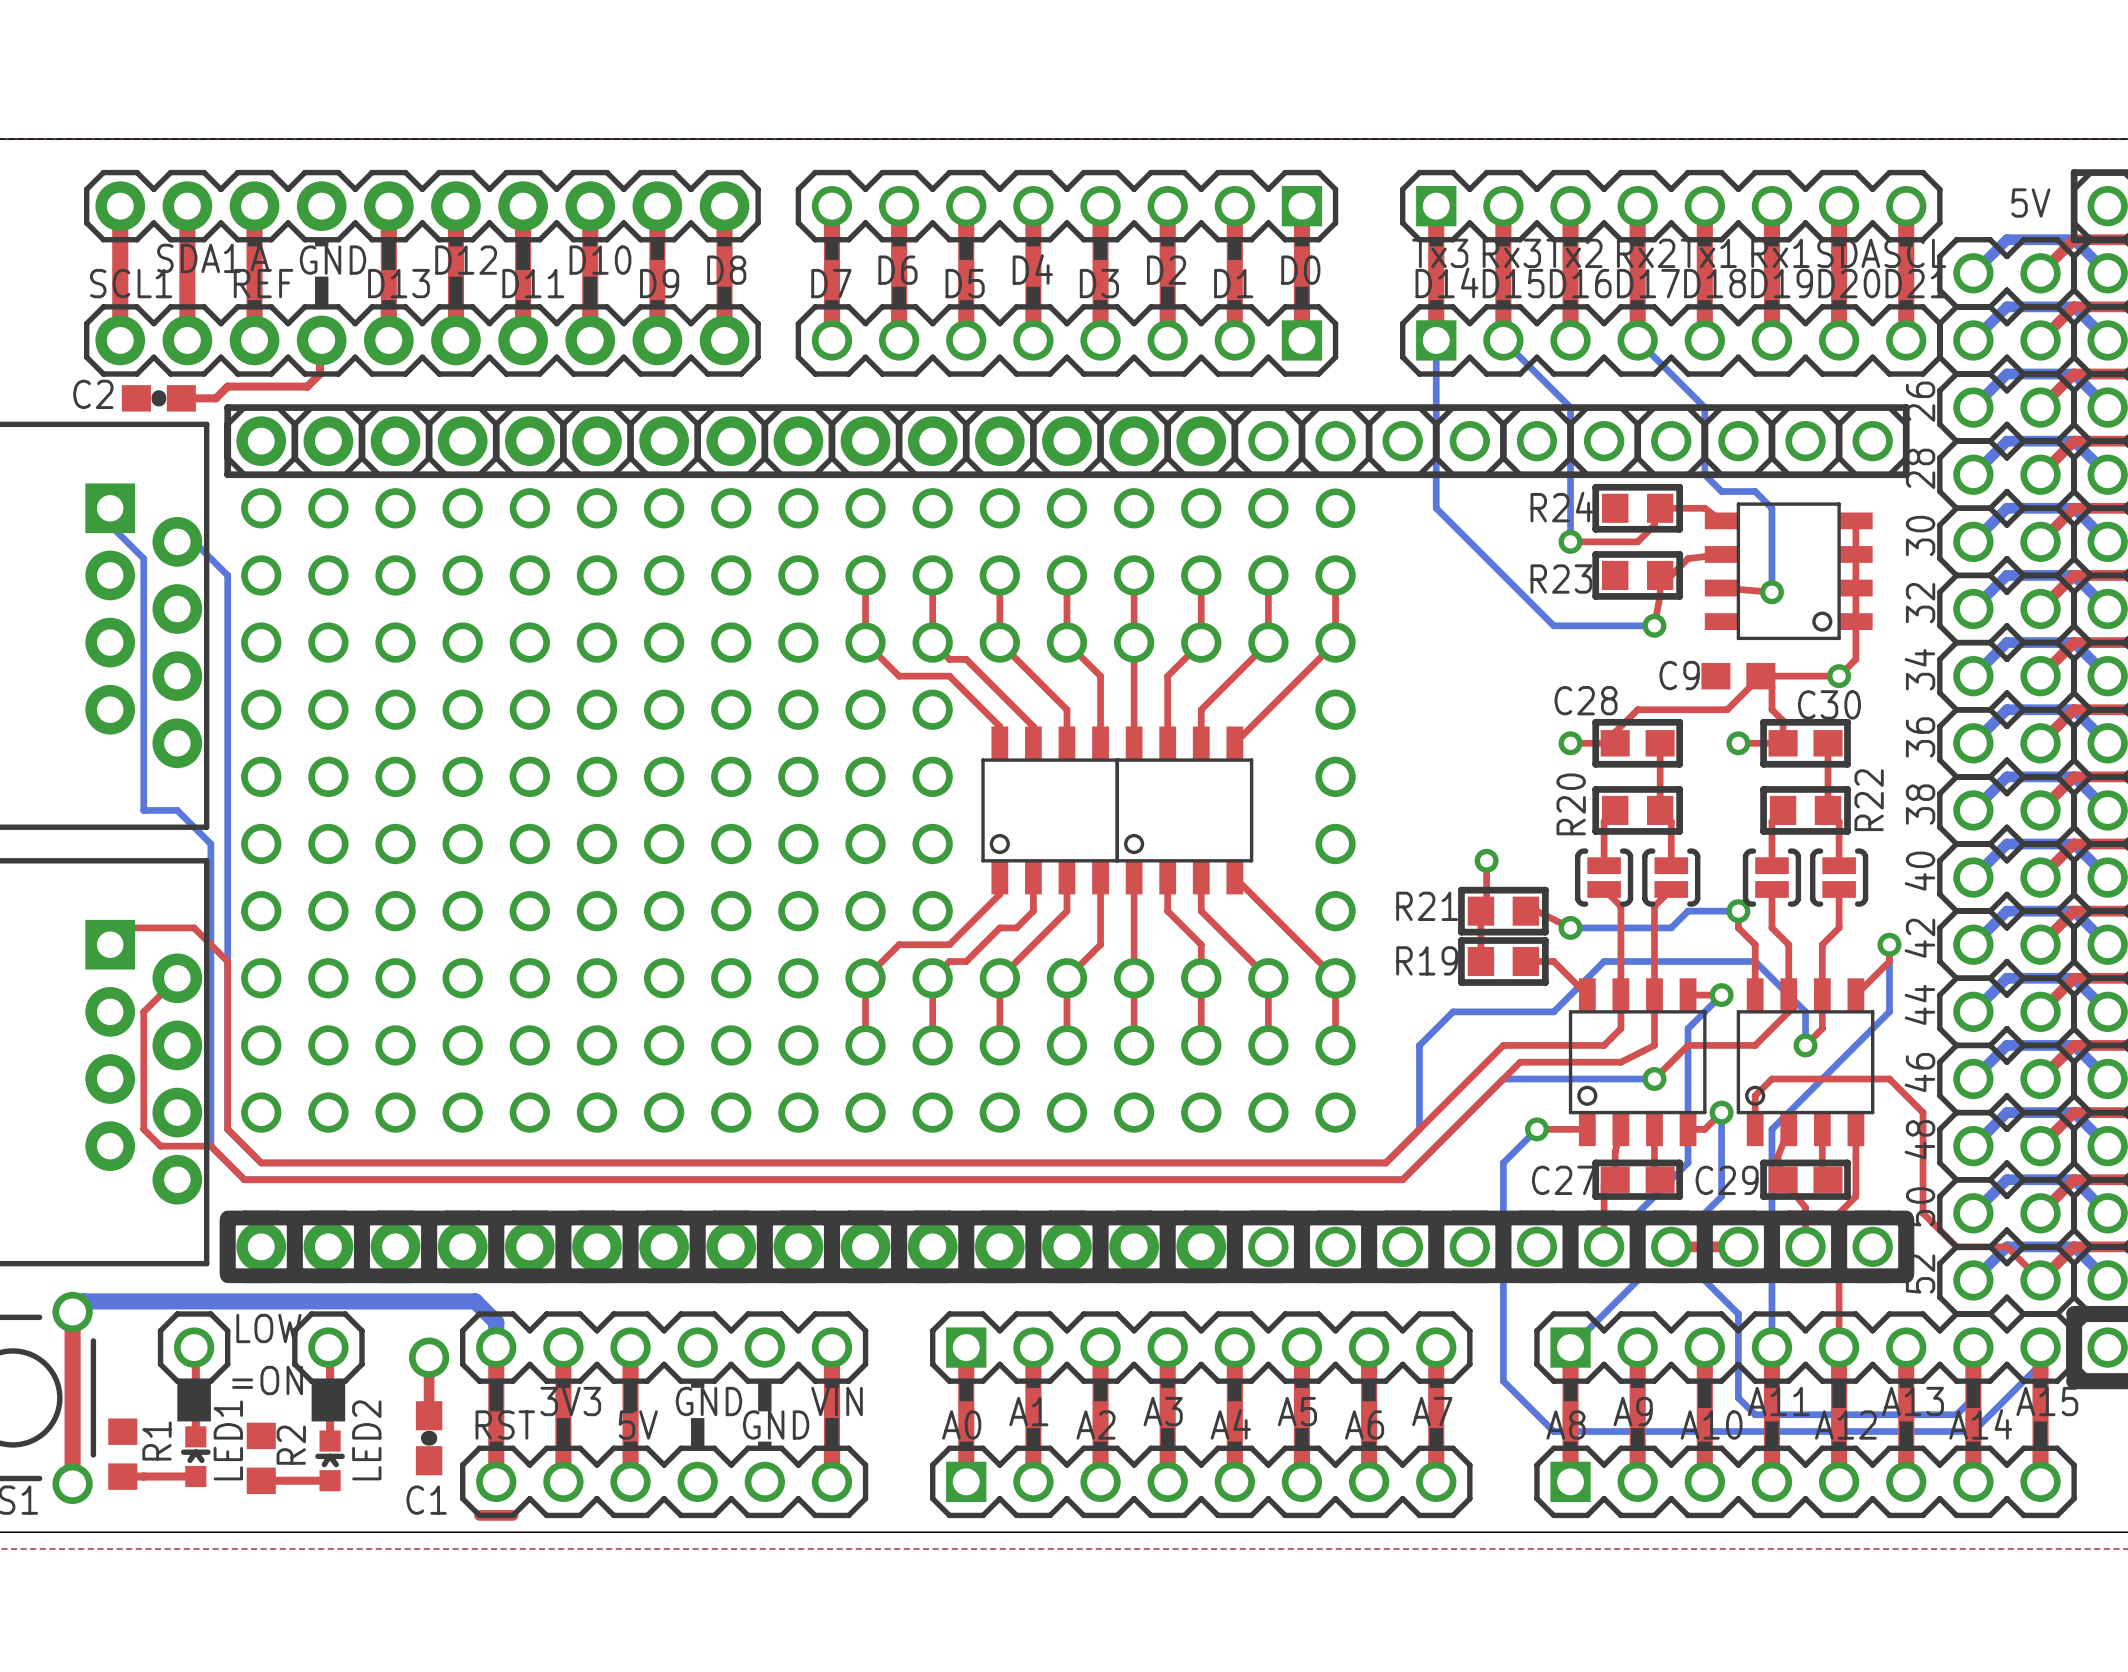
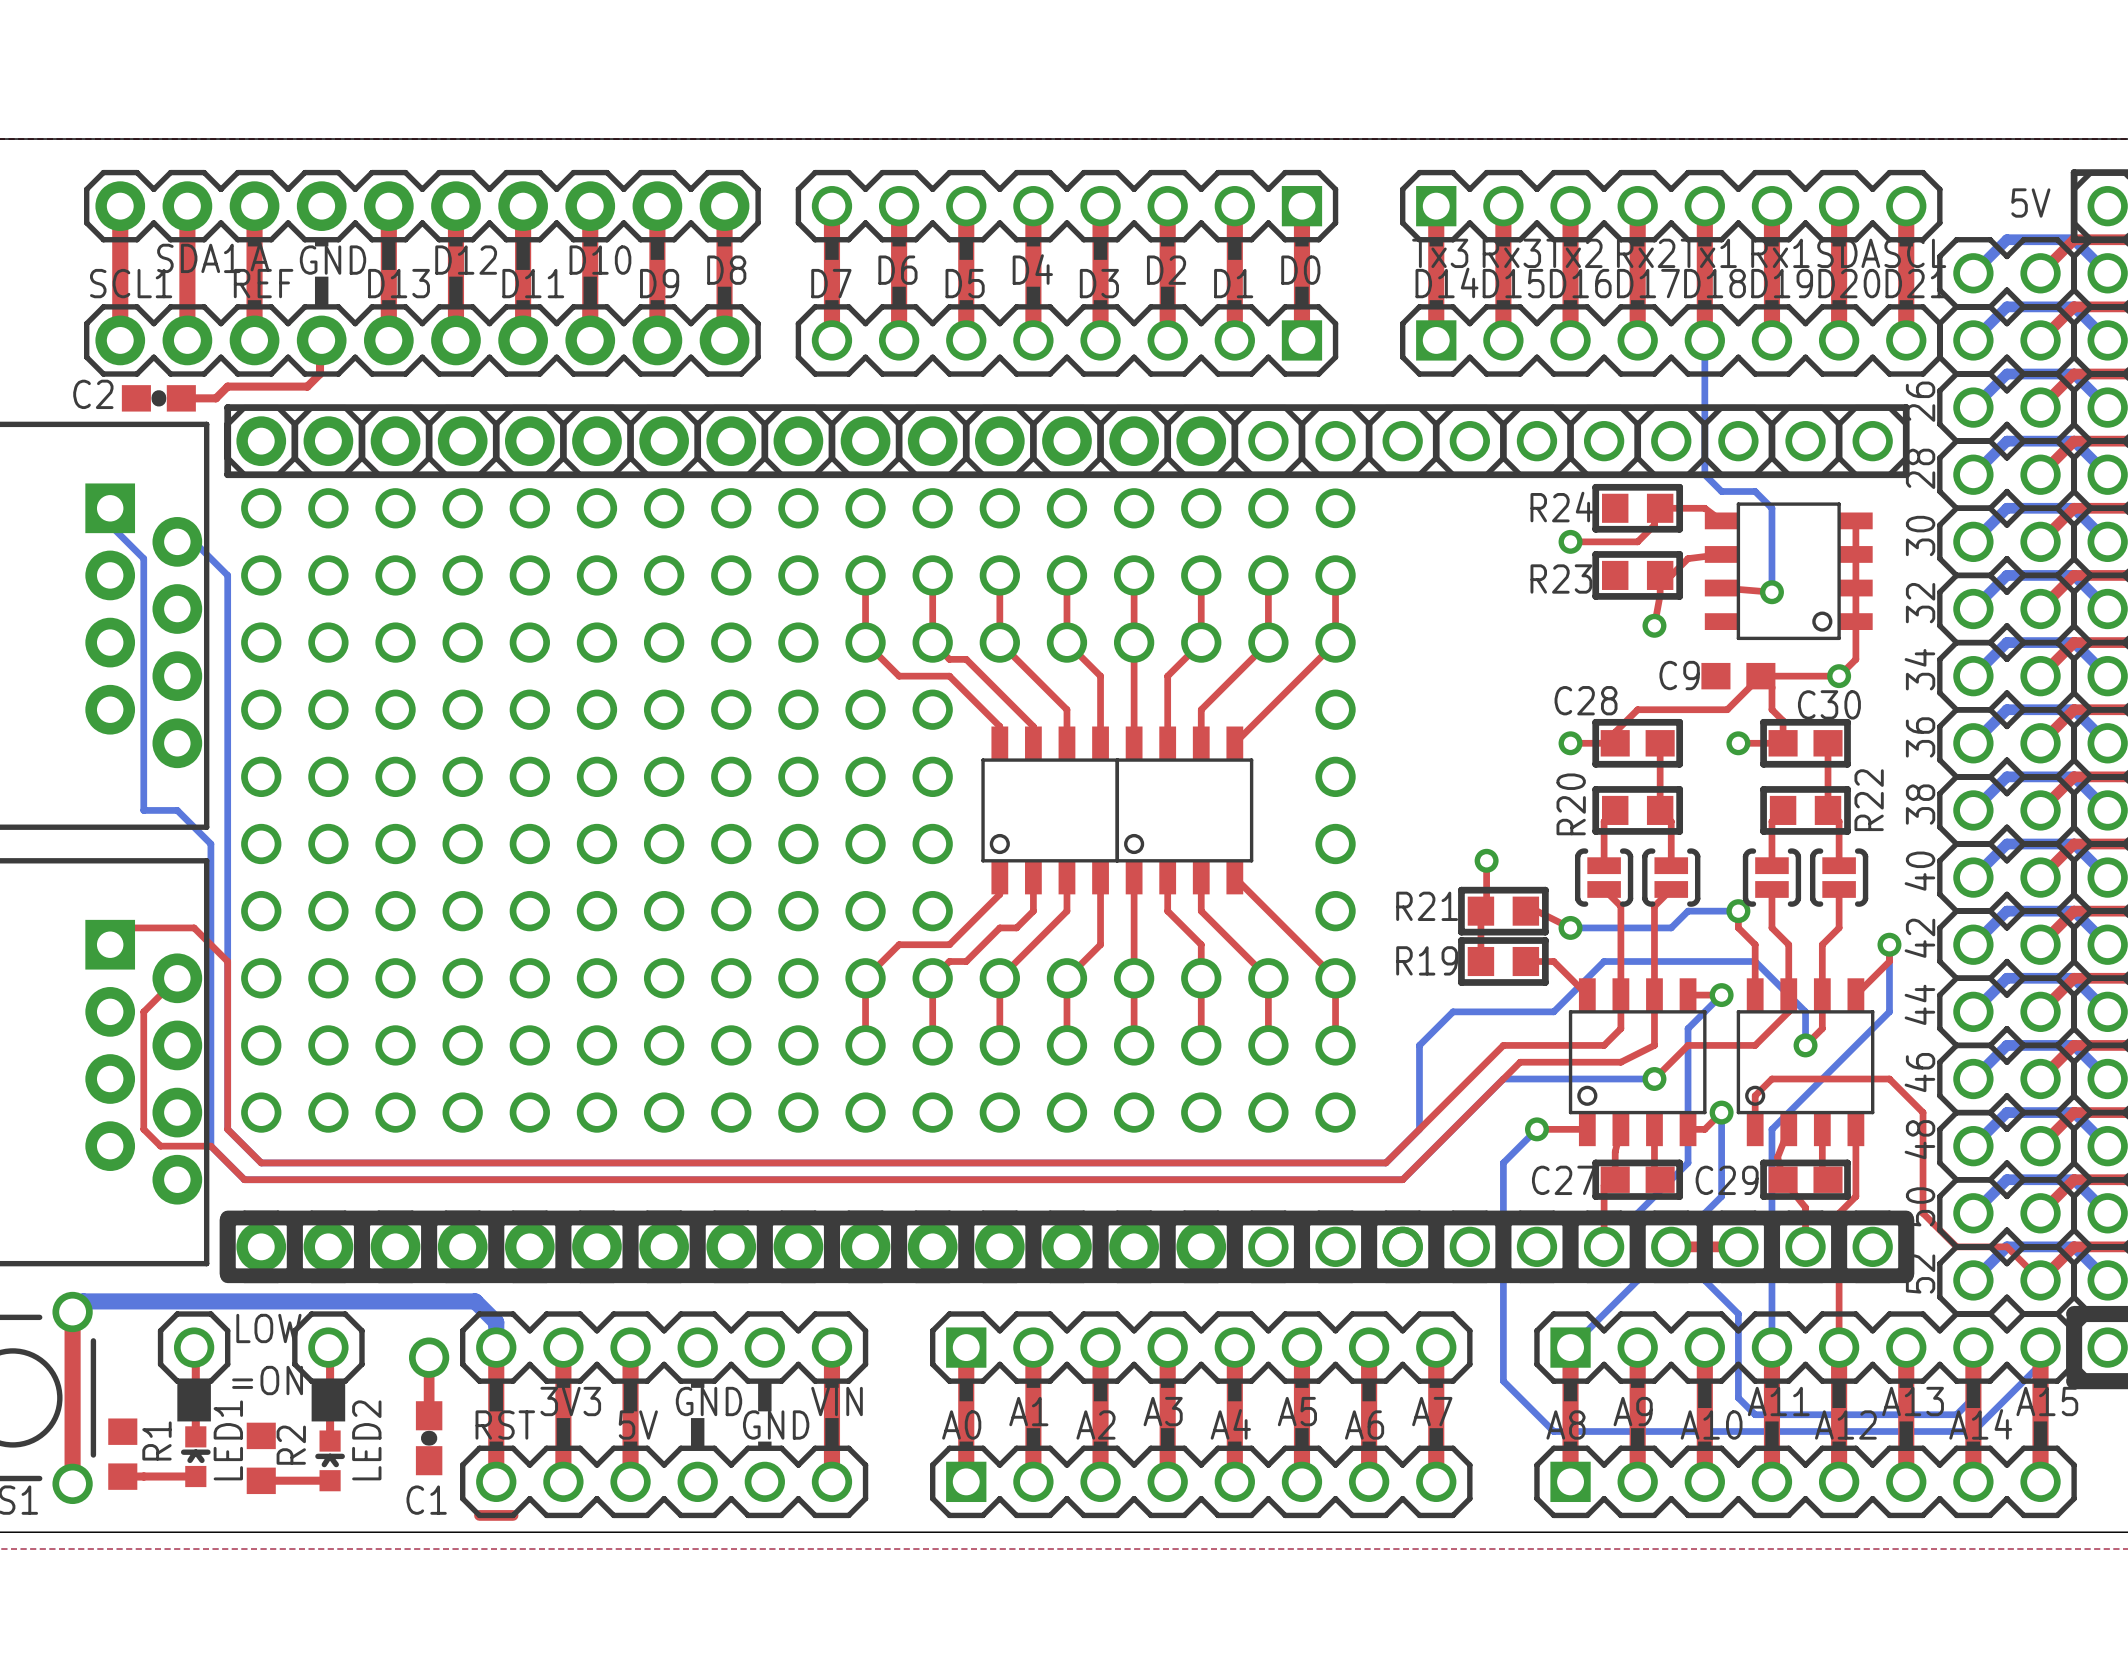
bottom track: (1436, 340) (1436, 508) (1553, 625) (1654, 625) -> none
bottom track: (1503, 340) (1570, 407) (1570, 541) -> none
bottom track: (1637, 340) (1704, 407) -> (1704, 340) (1704, 407)

